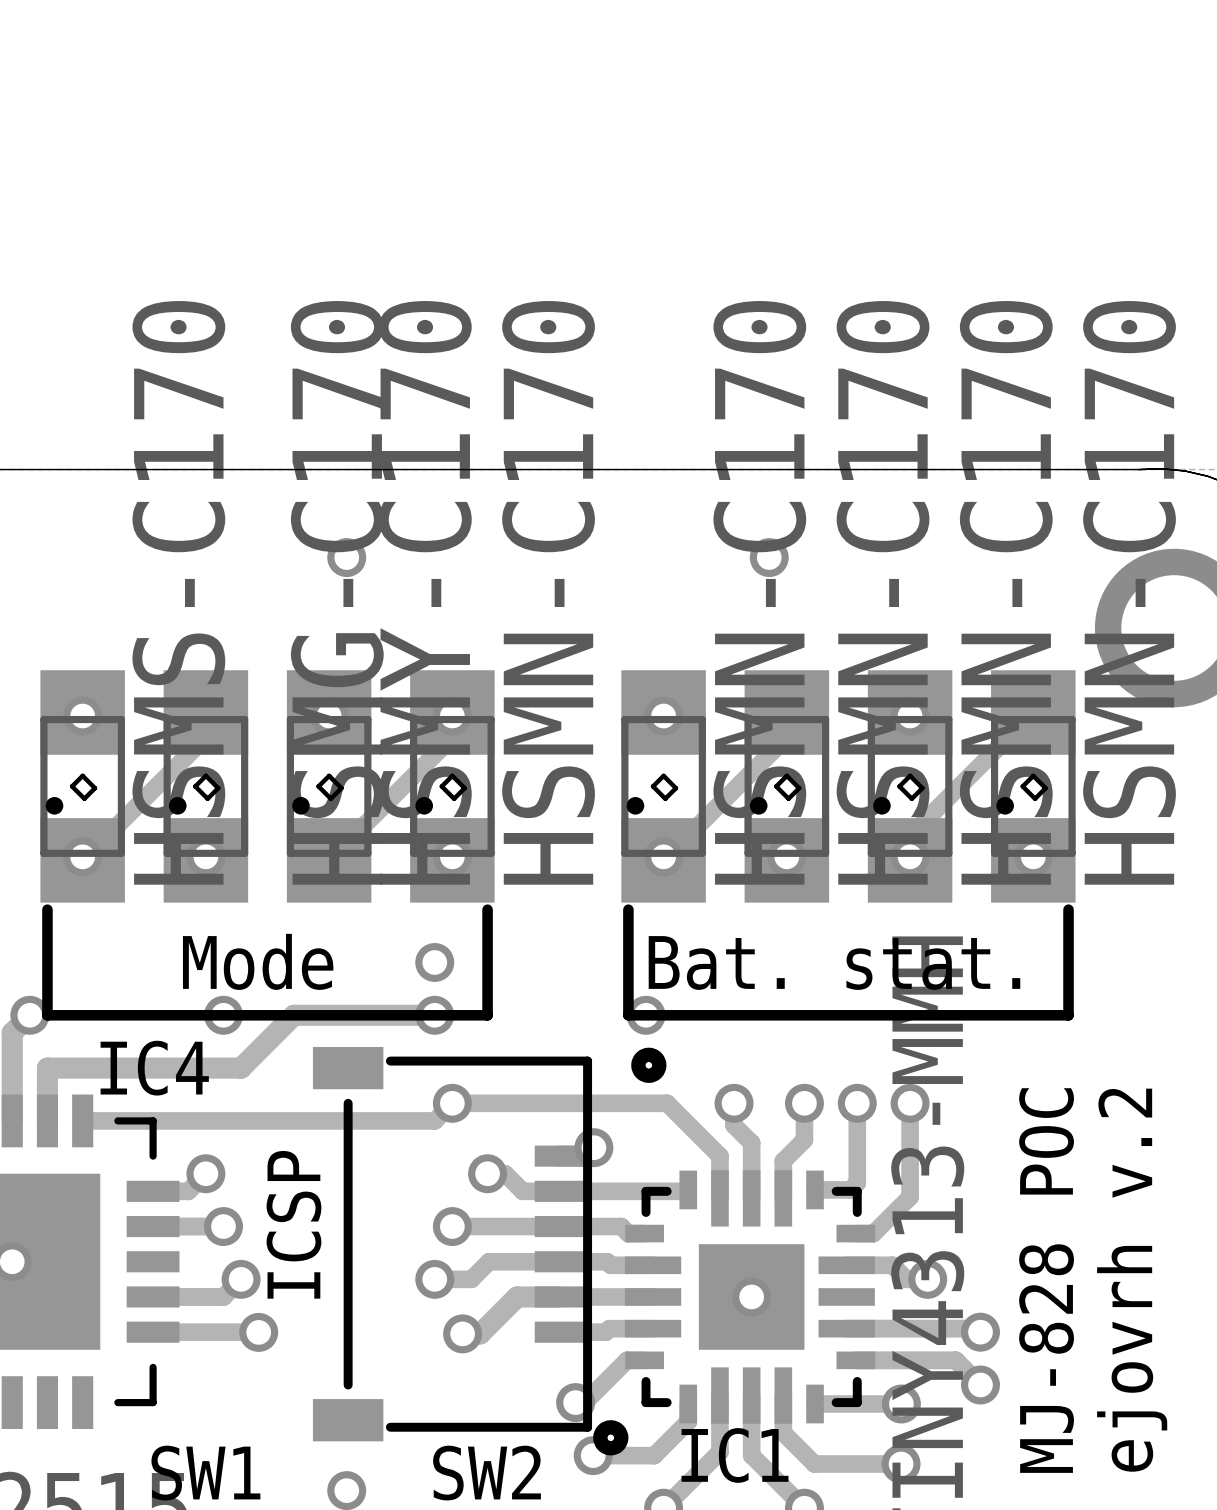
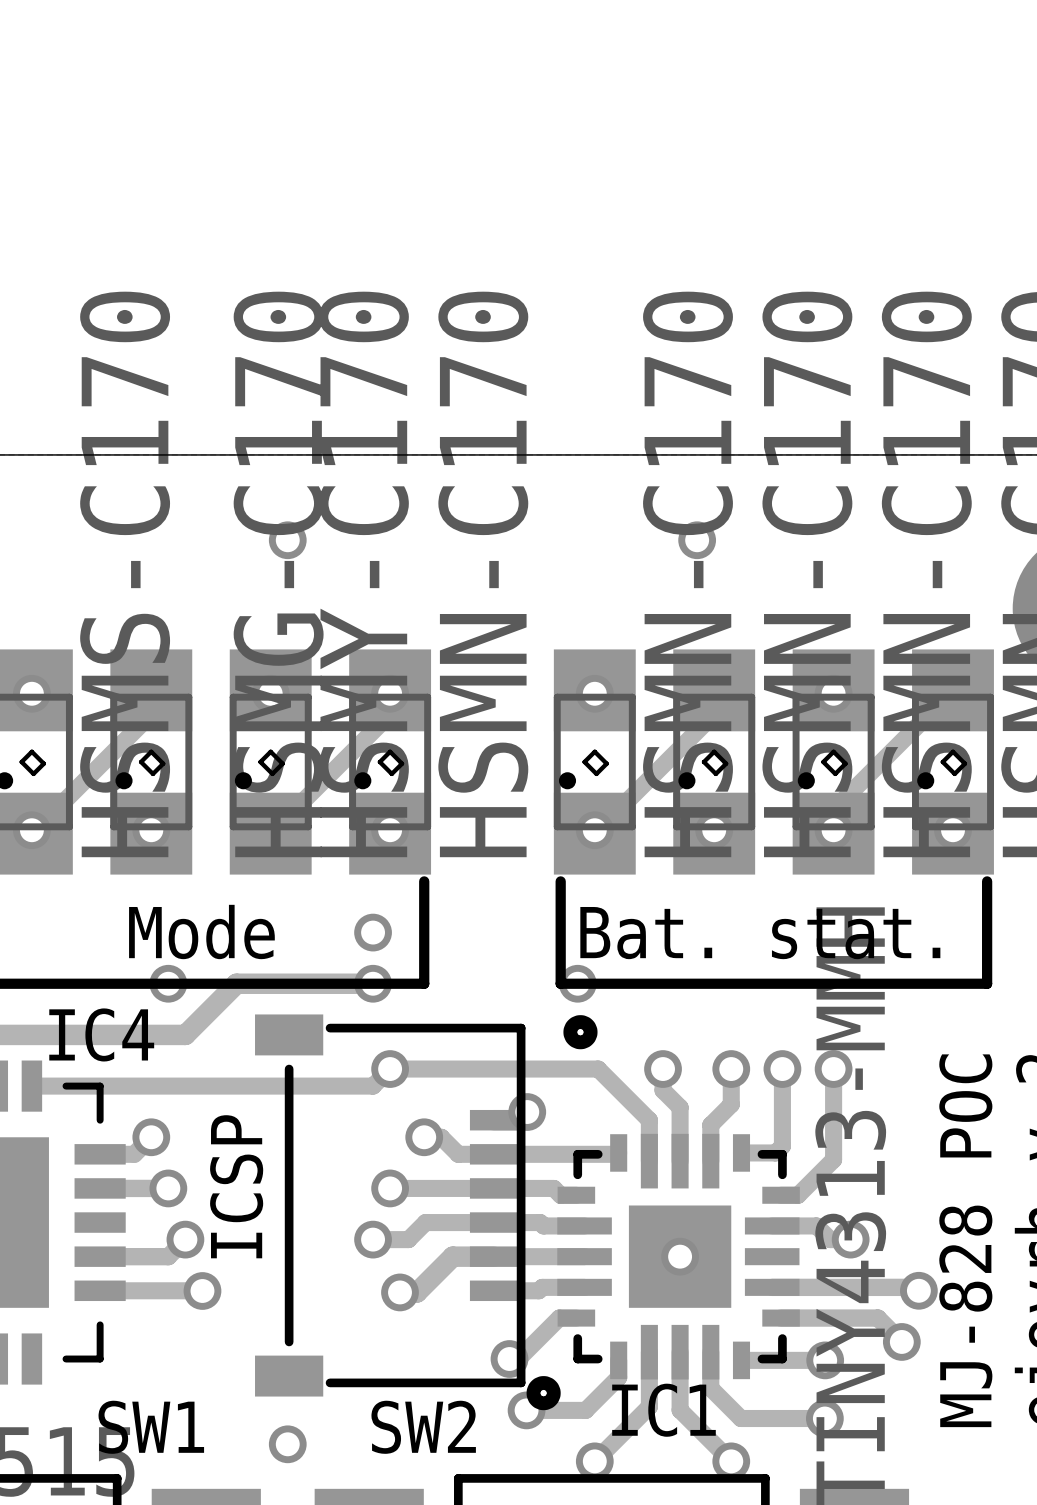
via position: (980, 1332) -> (918, 1290)

